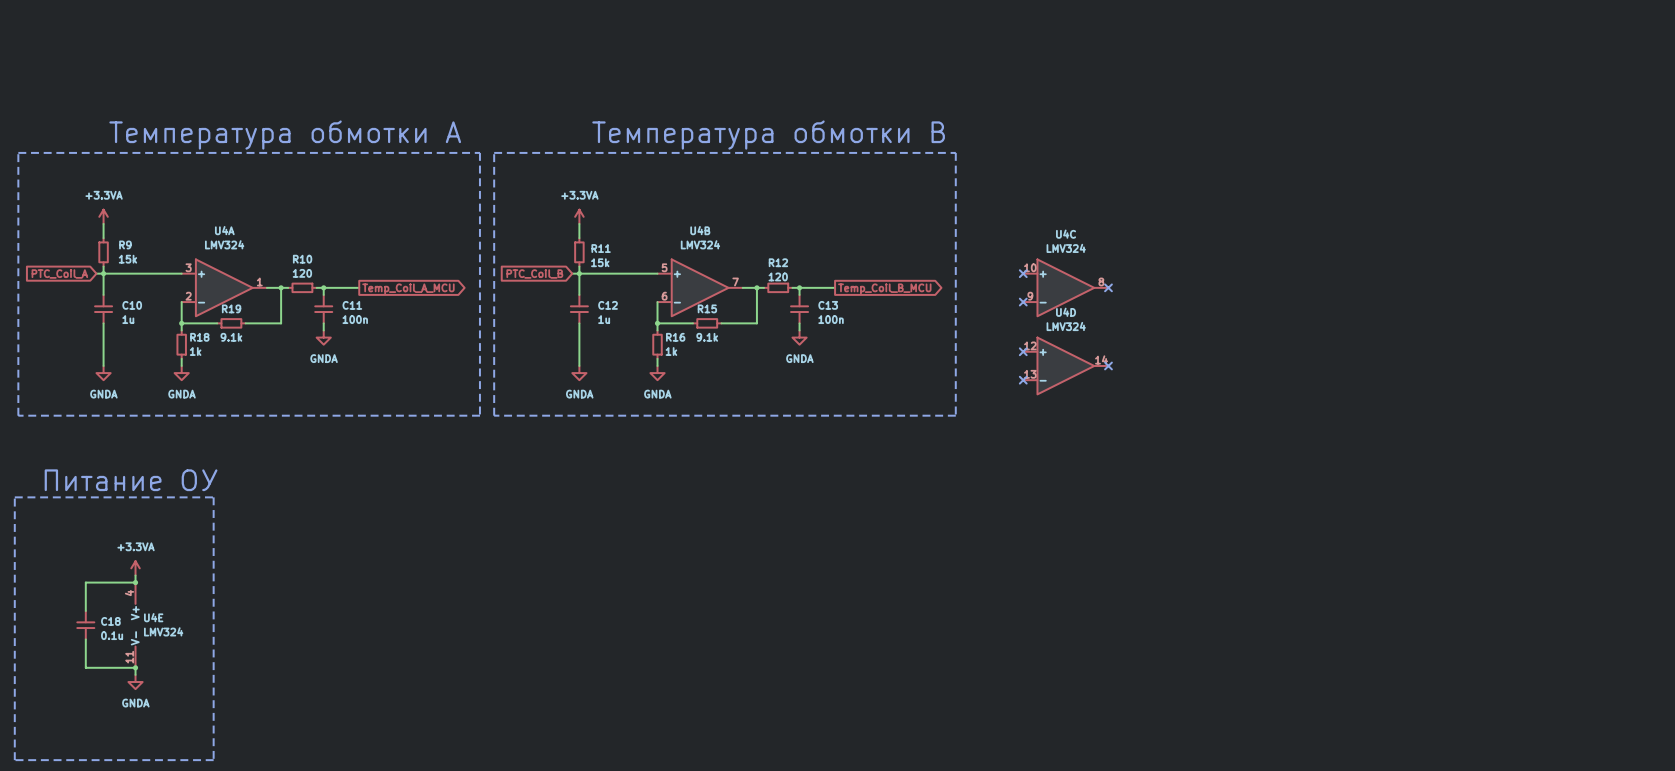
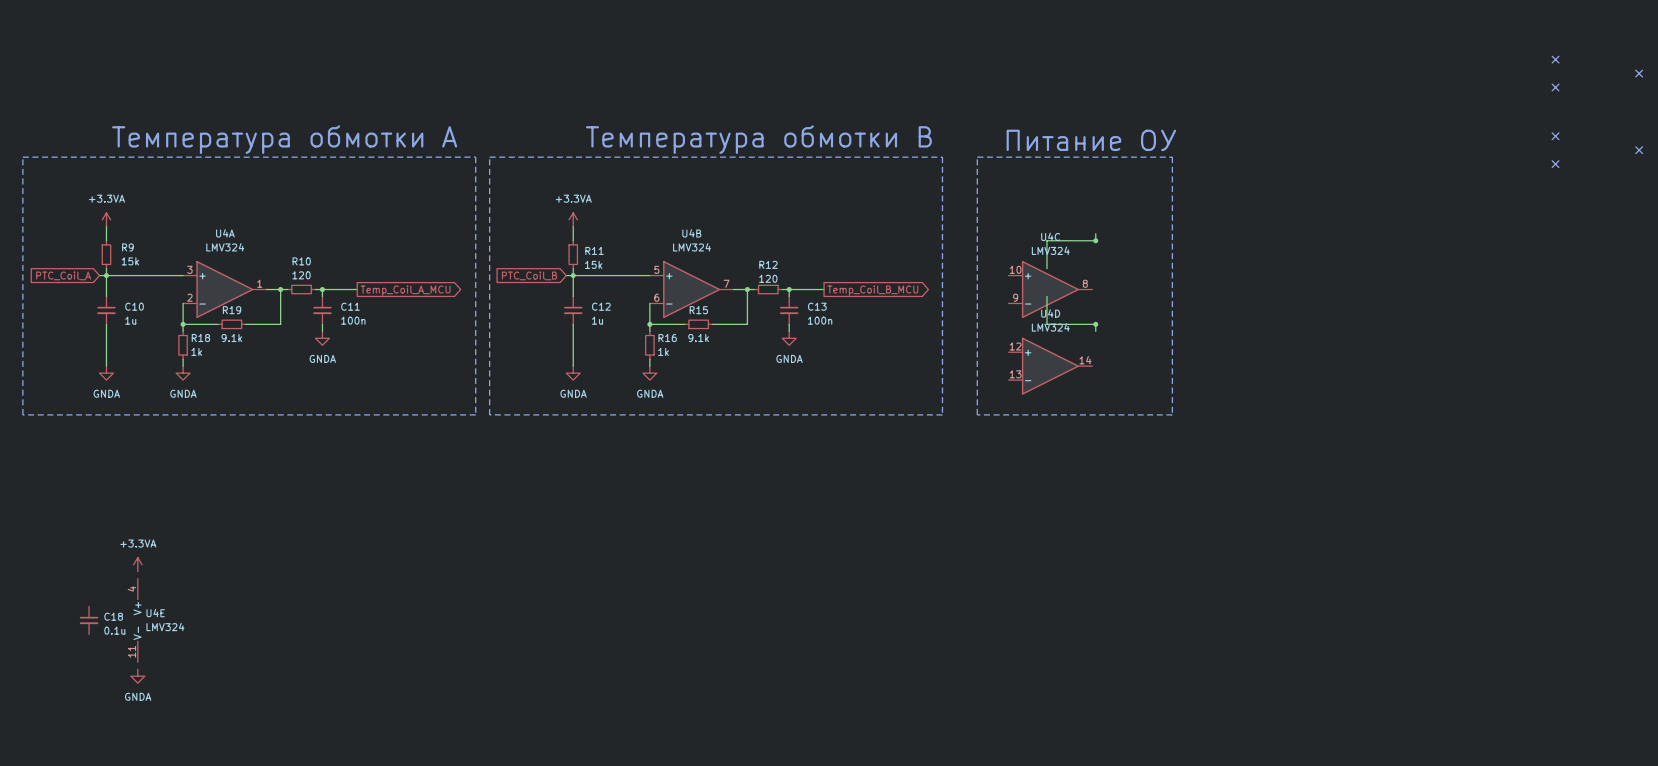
no-connect mark: none -> (1555, 59)
no-connect mark: none -> (1639, 73)
no-connect mark: none -> (1555, 87)
no-connect mark: none -> (1555, 136)
text: none -> Питание ОУ (1091, 140)
no-connect mark: none -> (1639, 150)
line: none -> (977, 157) (1172, 157) (1172, 414) (977, 414) (977, 157)
no-connect mark: none -> (1555, 164)
wire: none -> (1095, 233) (1095, 240) (1046, 240) (1046, 268)
junction: none -> (1095, 240)
no-connect mark: (1023, 273) -> none
no-connect mark: (1108, 287) -> none
wire: none -> (1046, 296) (1046, 324) (1095, 324) (1095, 331)
no-connect mark: (1023, 302) -> none
junction: none -> (1095, 324)
no-connect mark: (1023, 351) -> none
no-connect mark: (1108, 365) -> none
no-connect mark: (1023, 380) -> none
text: Питание ОУ (131, 480) -> none
line: (14, 497) (213, 497) (213, 760) (14, 760) (14, 497) -> none
wire: (135, 575) (135, 582) (85, 582) (85, 610) -> none
junction: (135, 582) -> none
wire: (85, 639) (85, 667) (135, 667) (135, 674) -> none
junction: (135, 667) -> none

